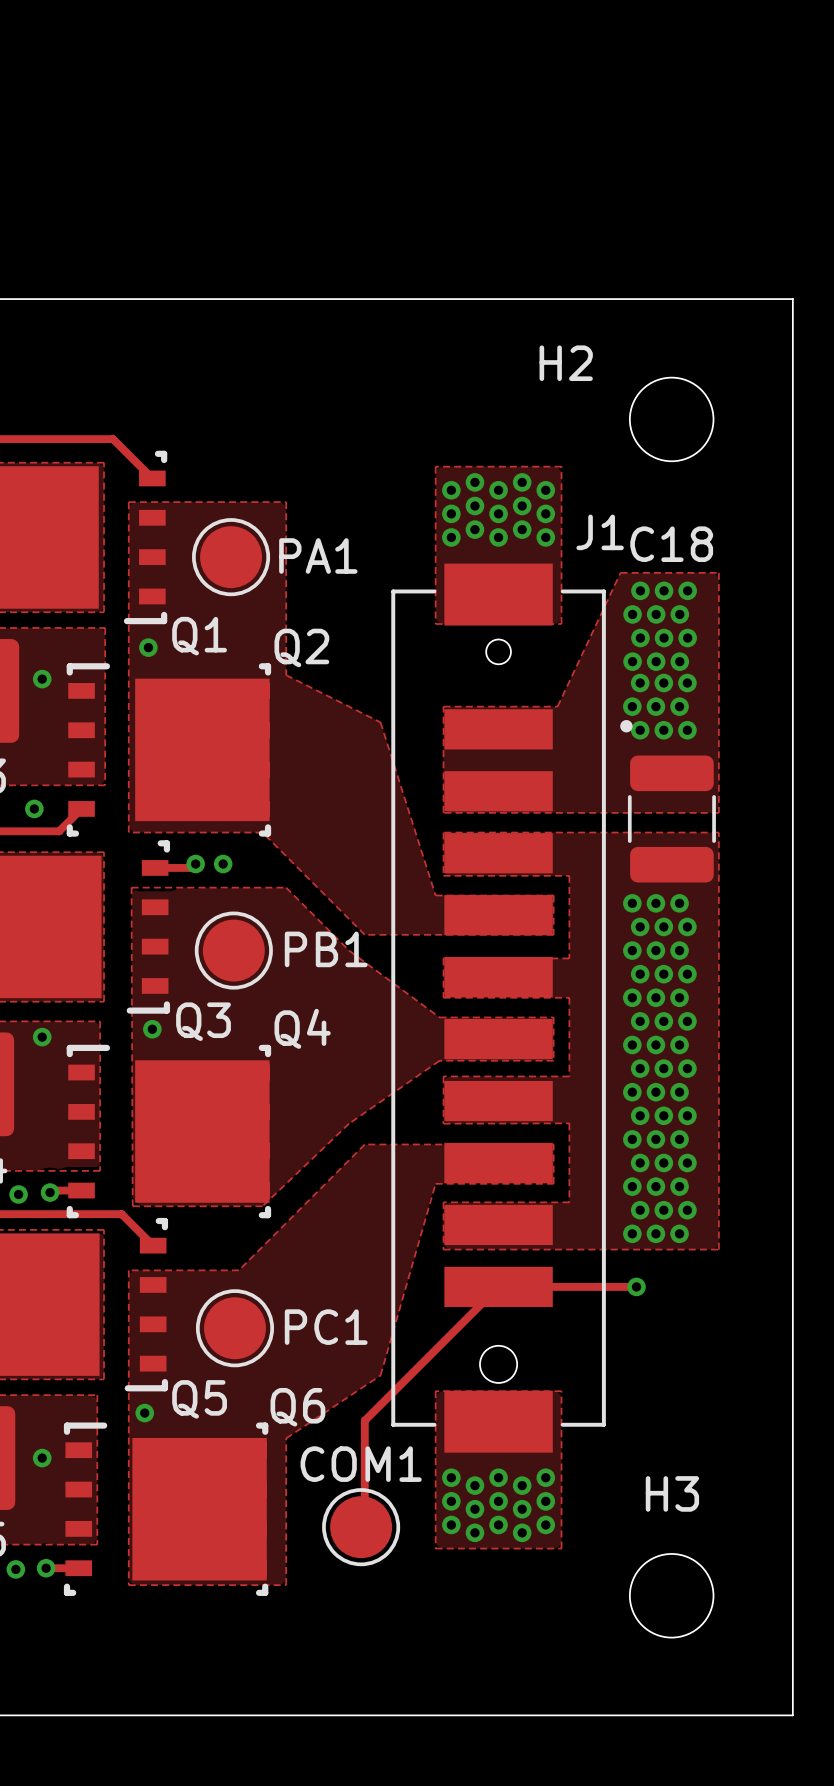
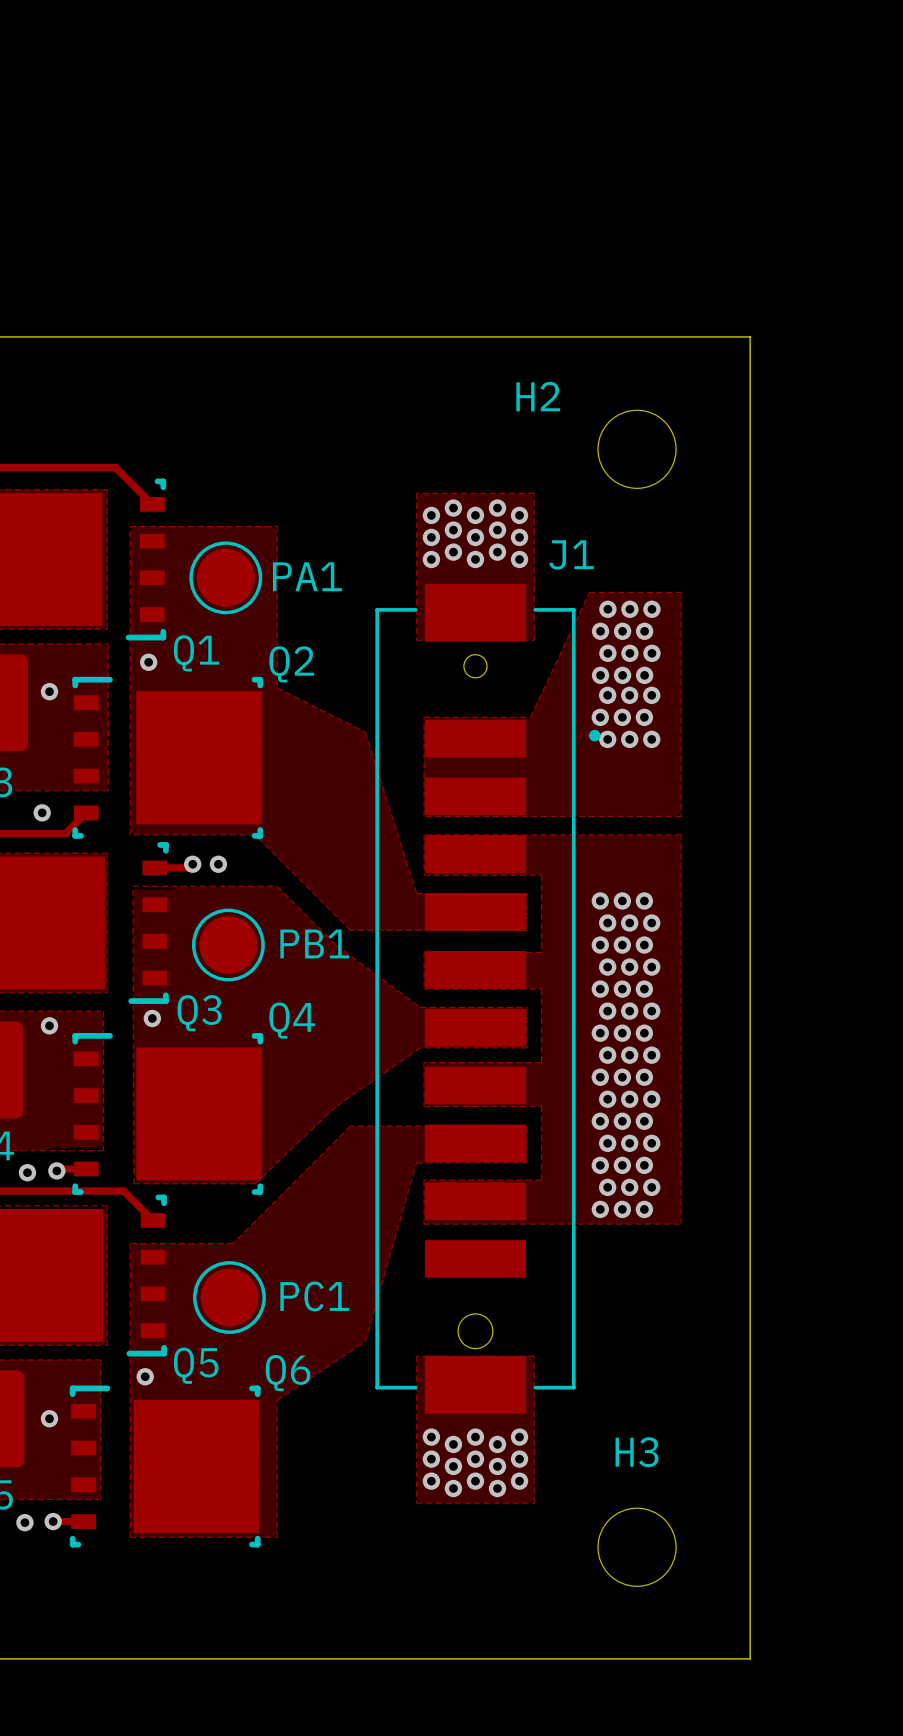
C18: (671, 819) -> none
track: (636, 1286) (498, 1286) (364, 1420) (364, 1540) -> none
via: (636, 1286) -> none
COM1: (361, 1527) -> none

